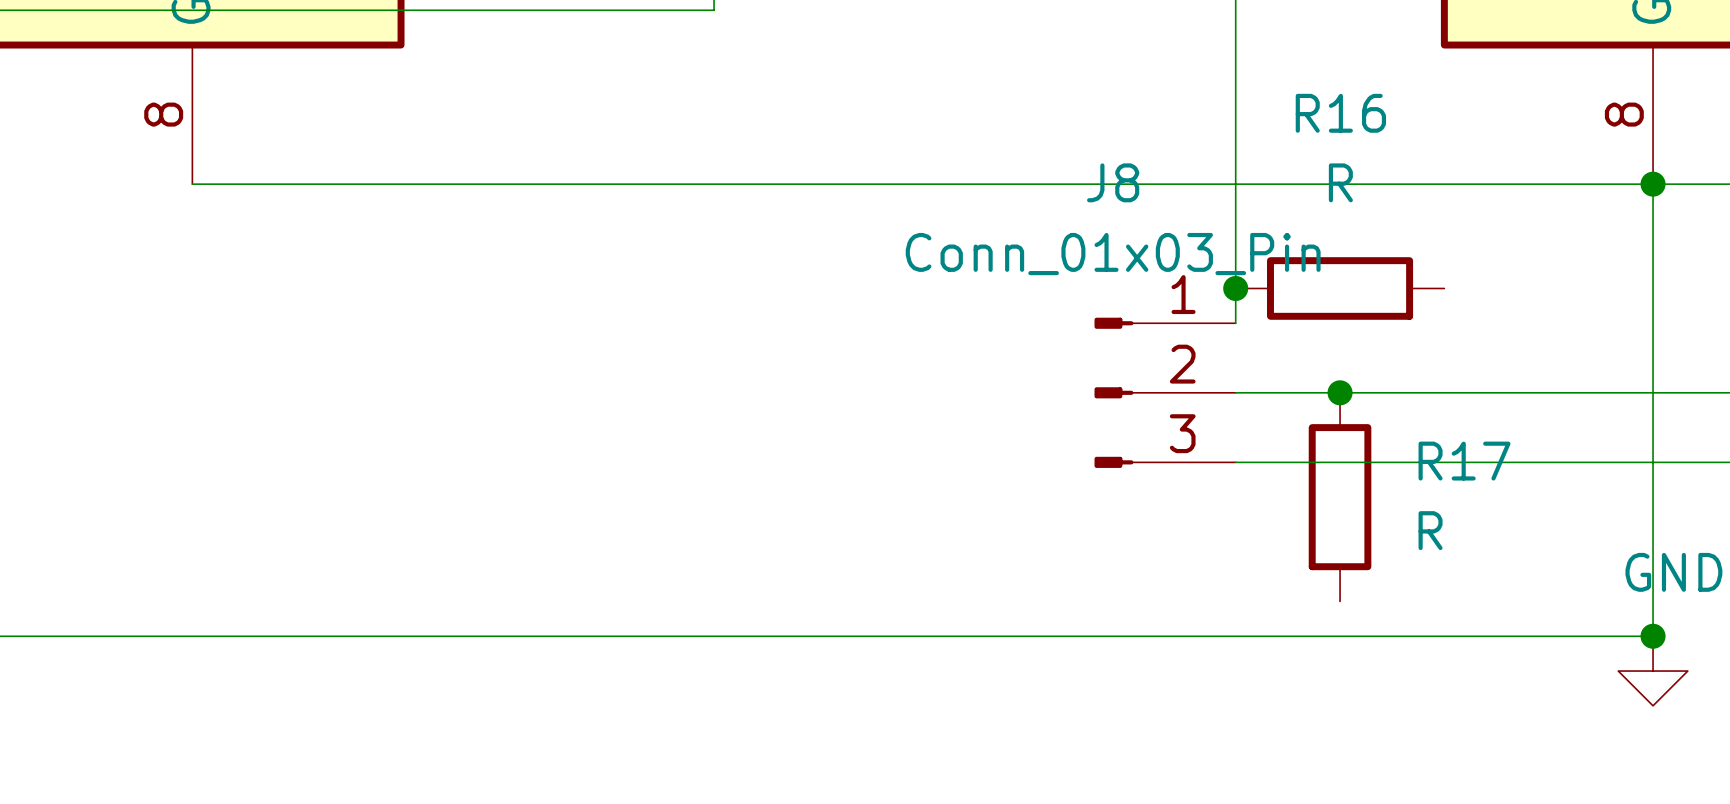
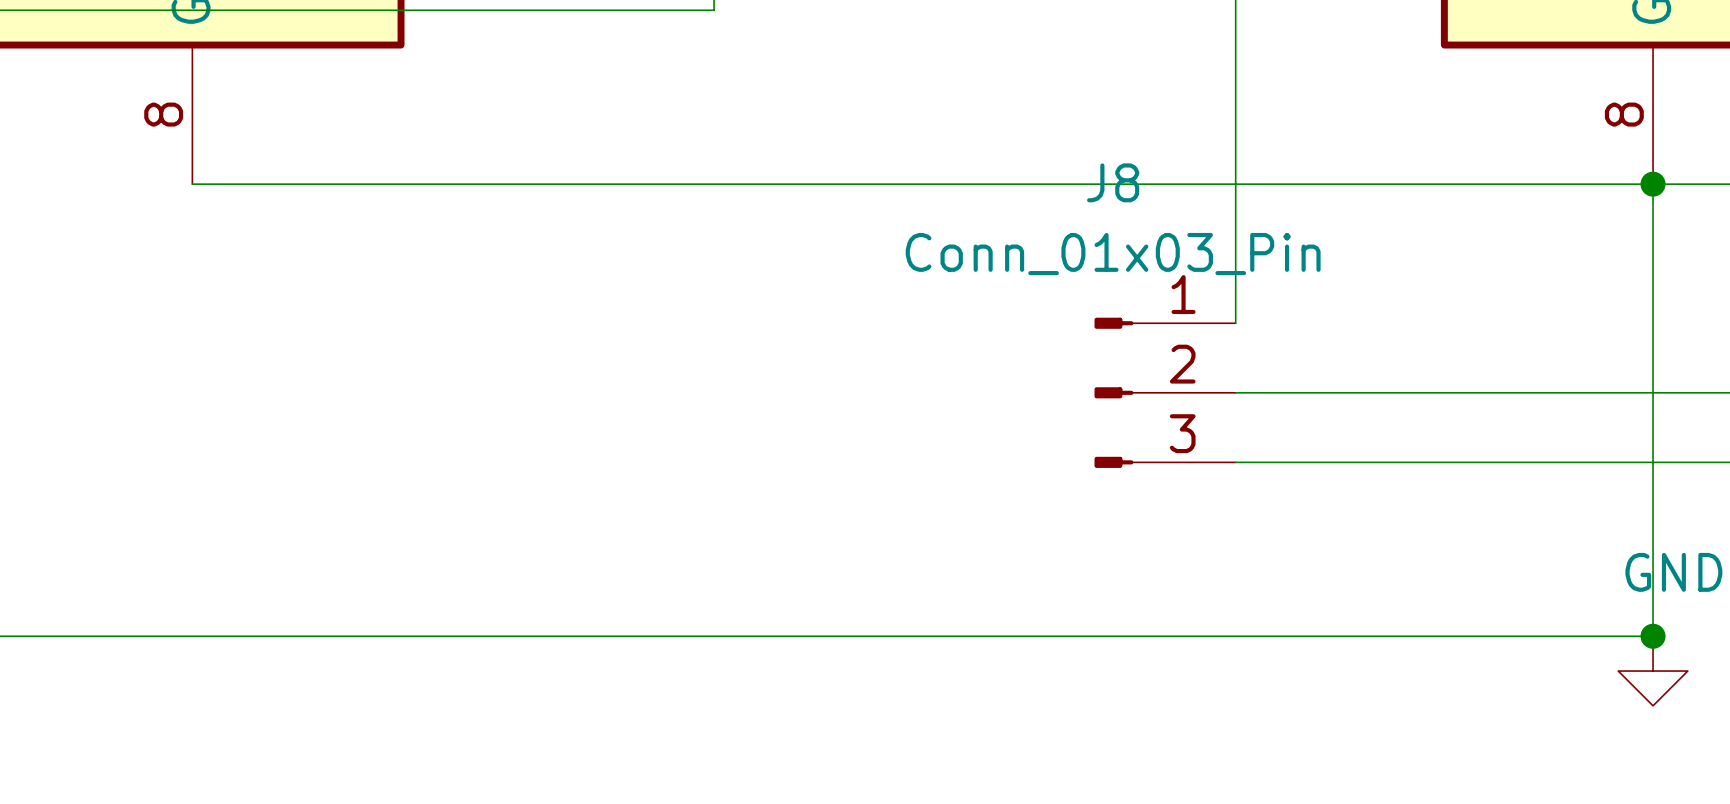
junction: (1235, 288) -> none
R16: R (1340, 288) -> none
junction: (1340, 392) -> none
R17: R (1340, 497) -> none

